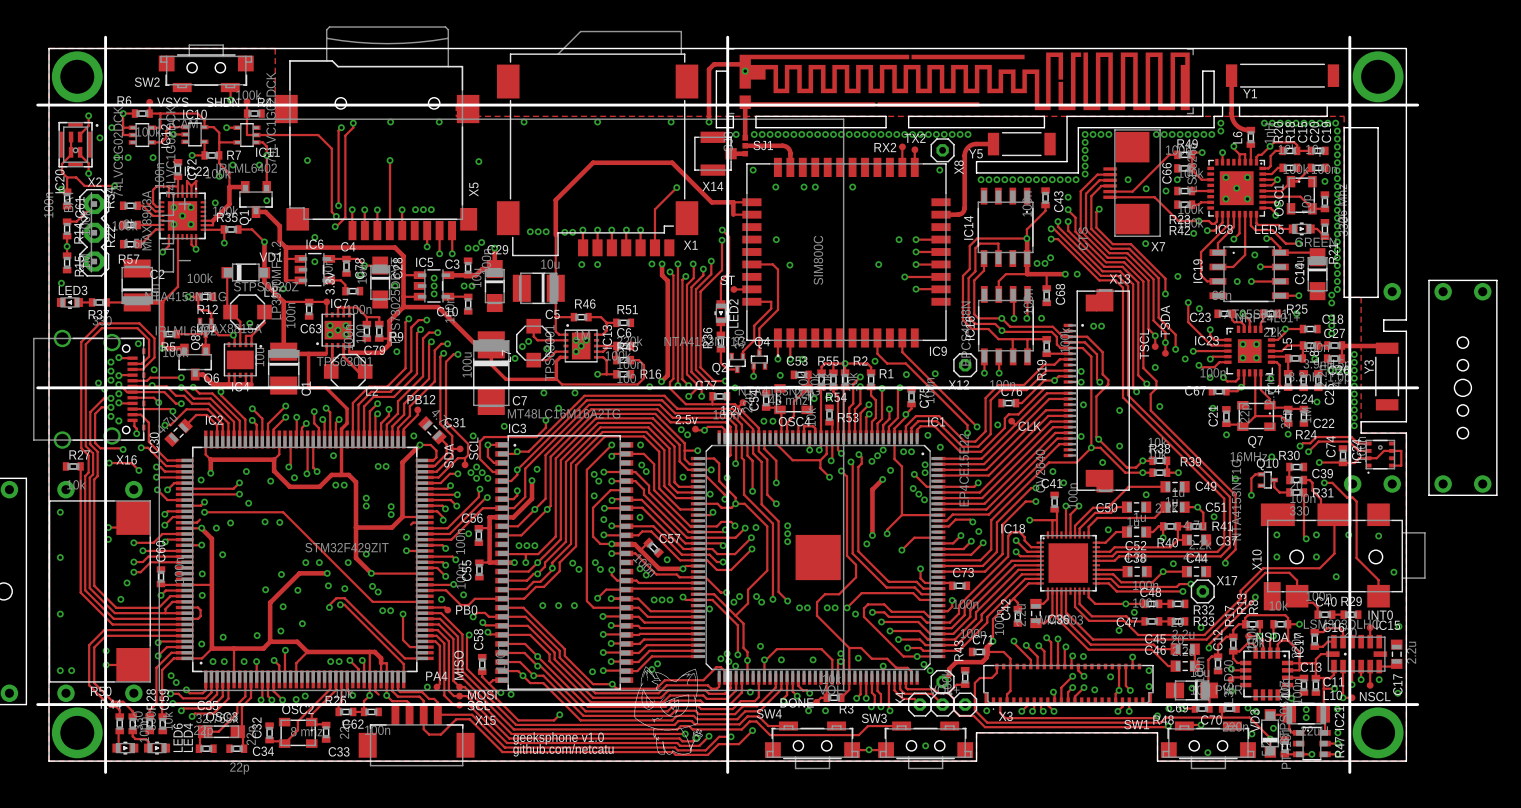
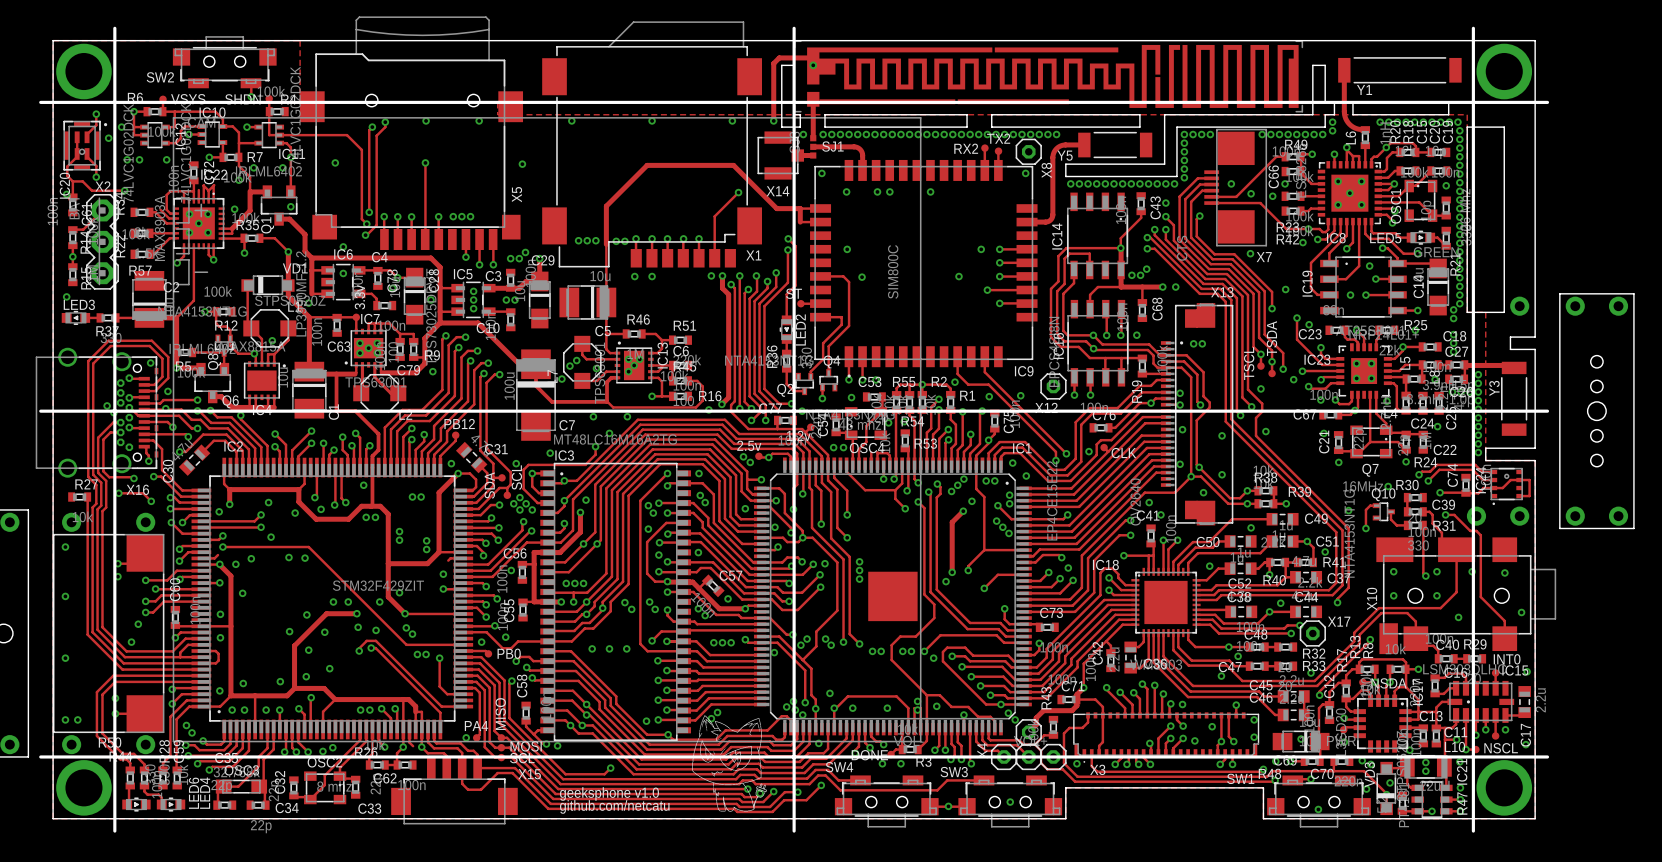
track: none -> (1346, 149) (1346, 164)

